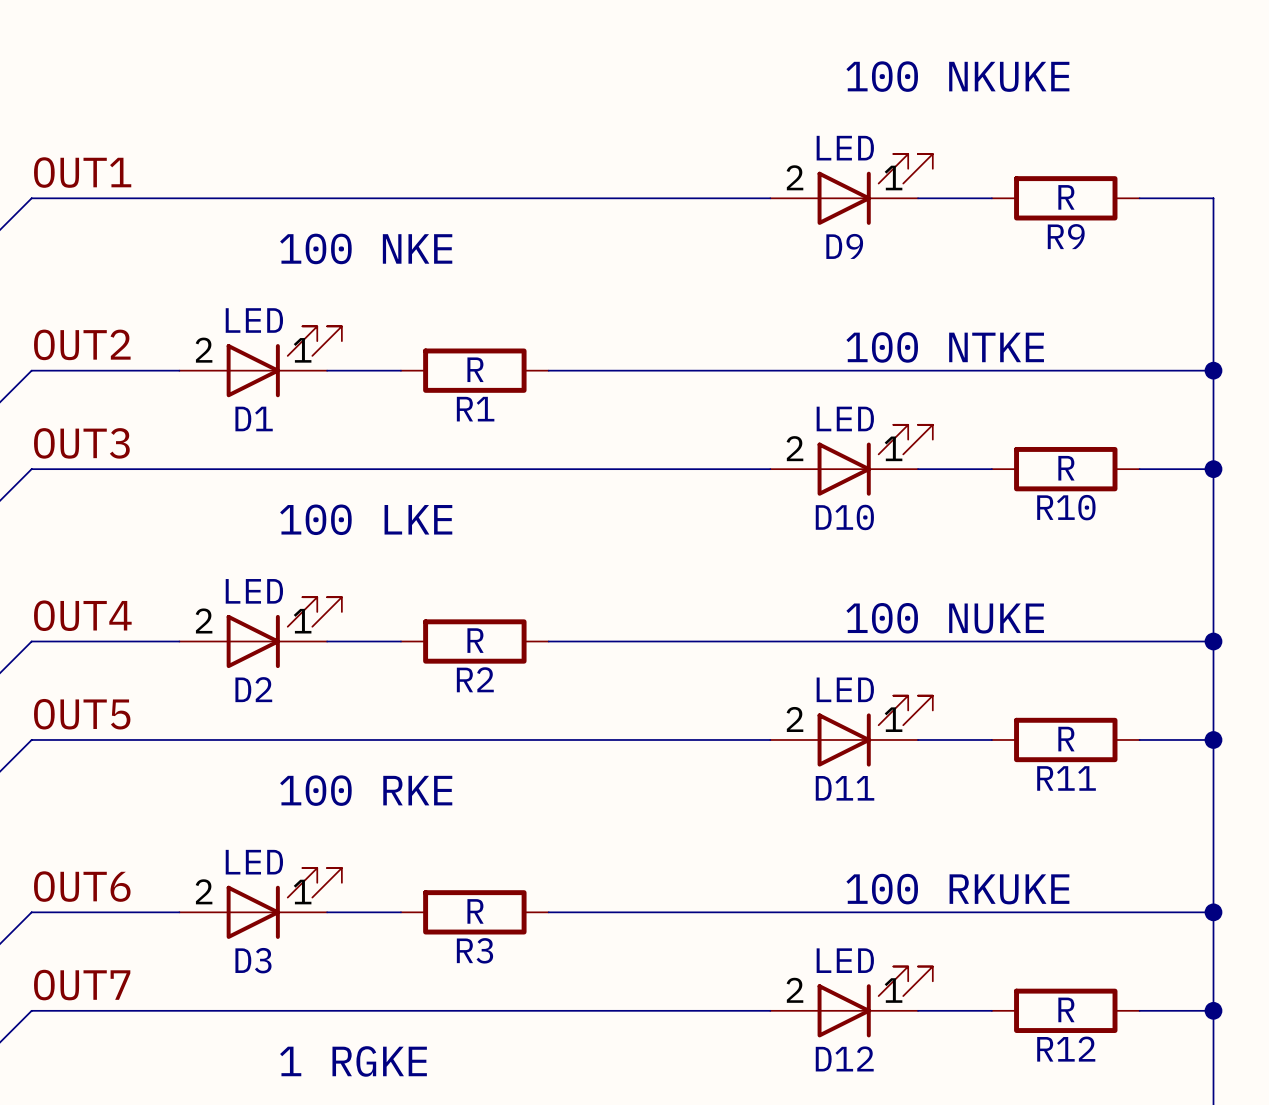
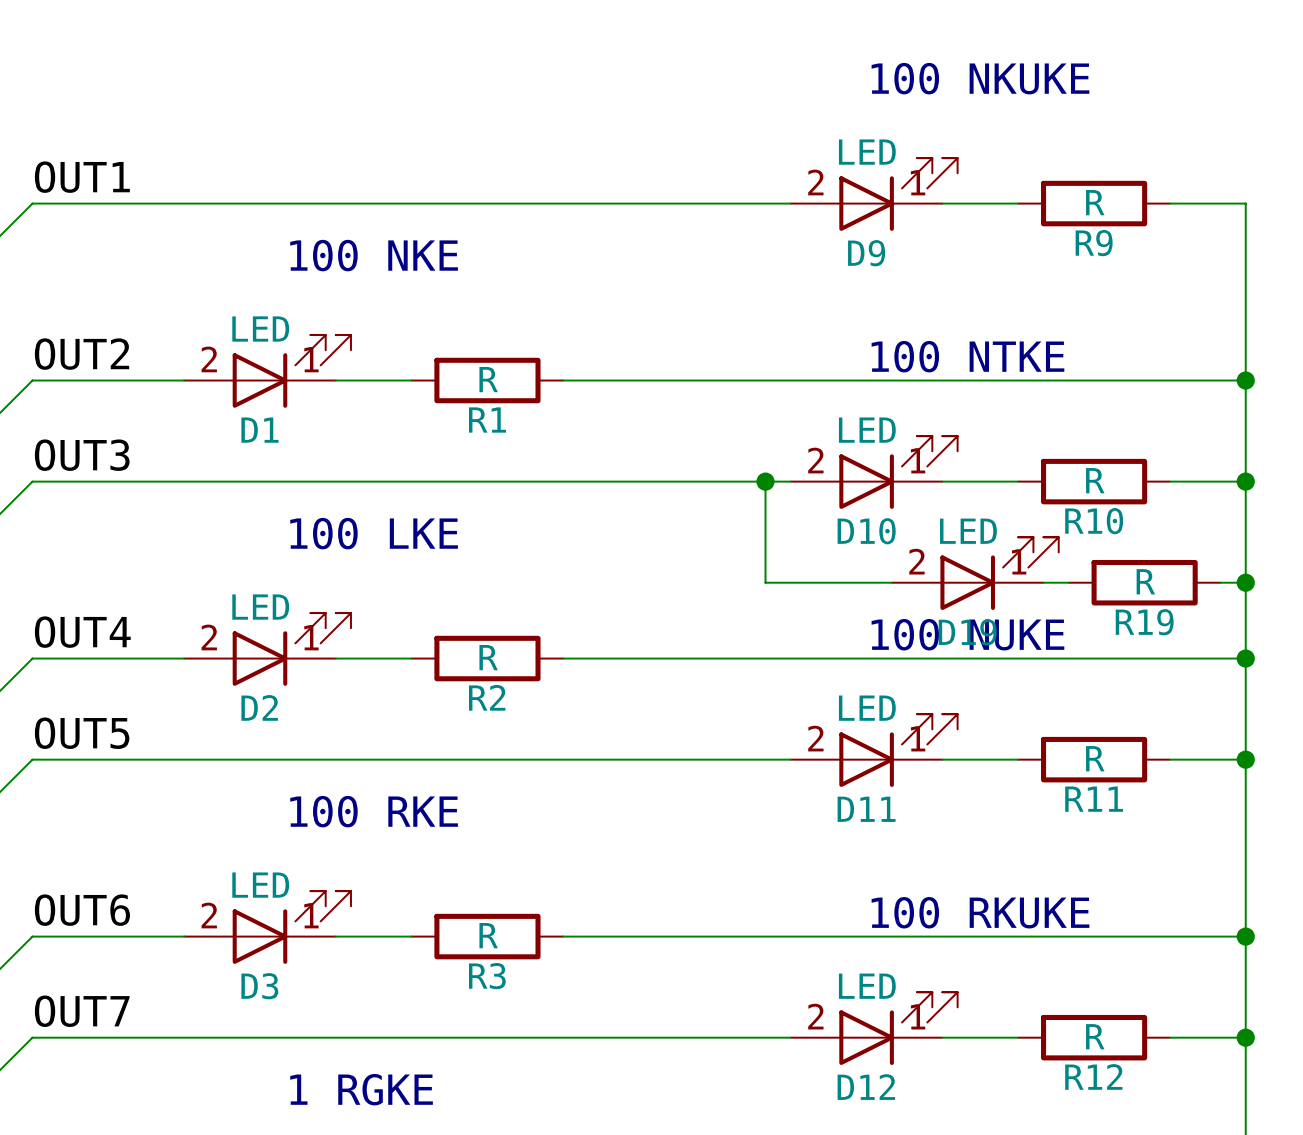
wire: none -> (765, 481) (765, 582) (891, 582)
junction: none -> (765, 481)
D19: none -> LED (975, 573)
wire: none -> (1043, 582) (1068, 582)
R19: none -> R (1144, 582)
wire: none -> (1220, 582) (1245, 582)
junction: none -> (1245, 582)

